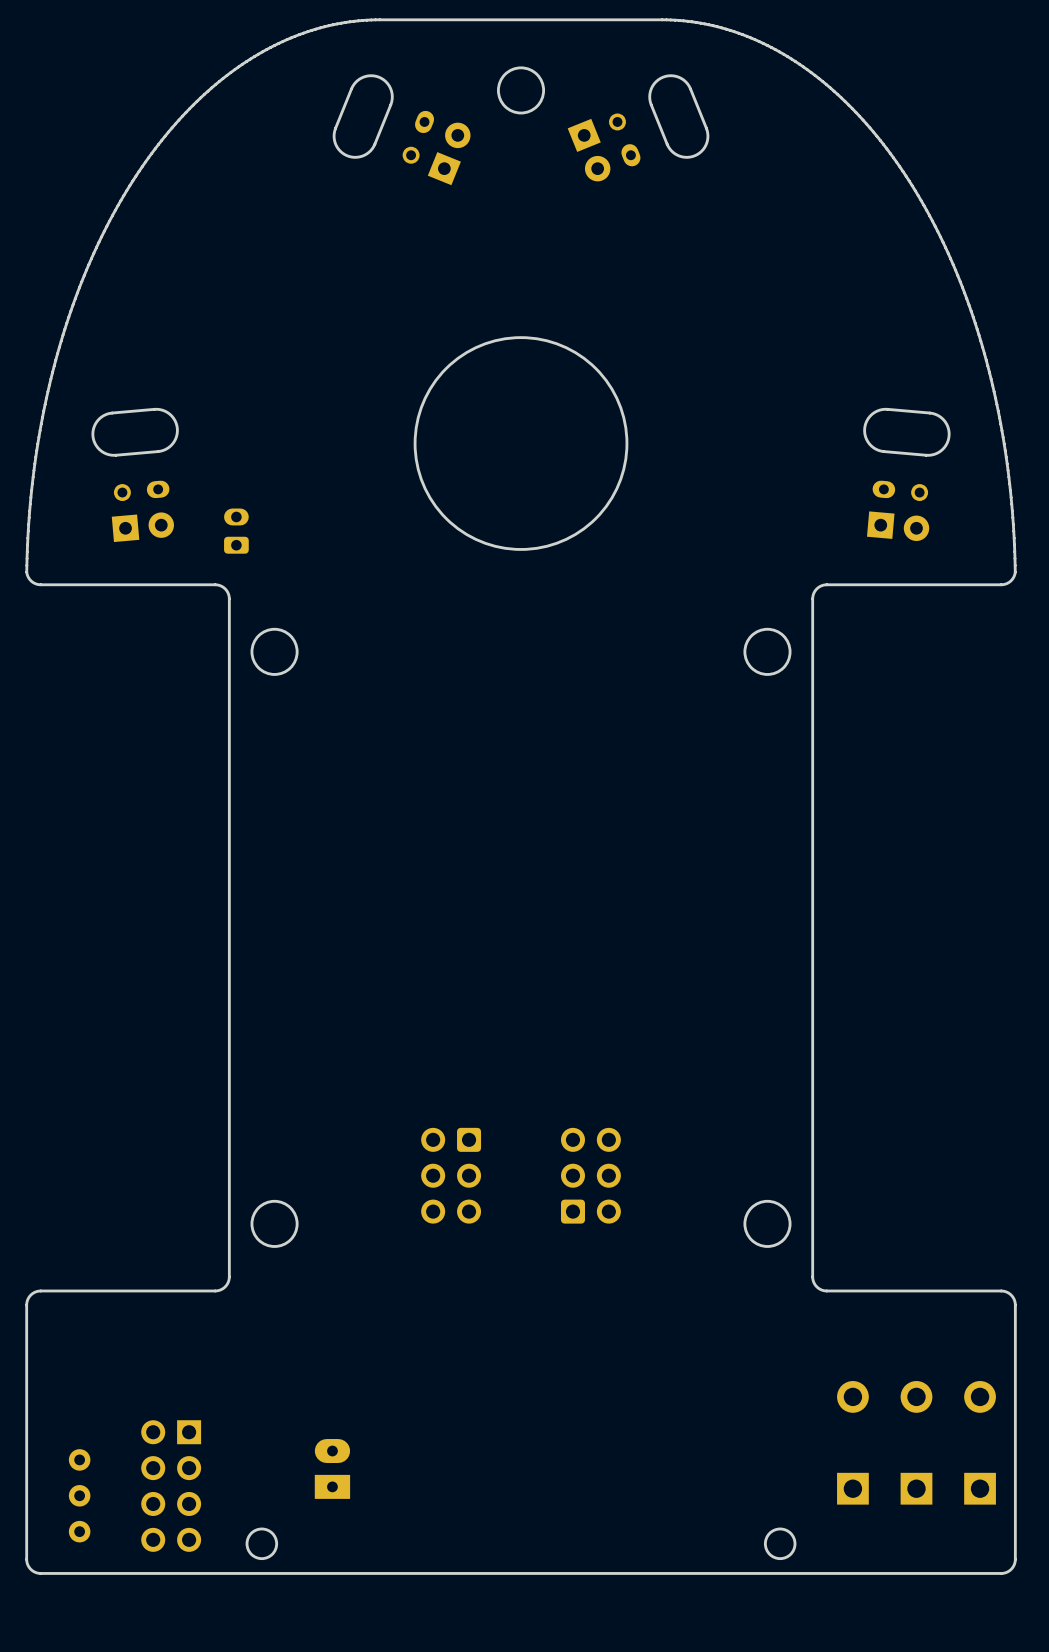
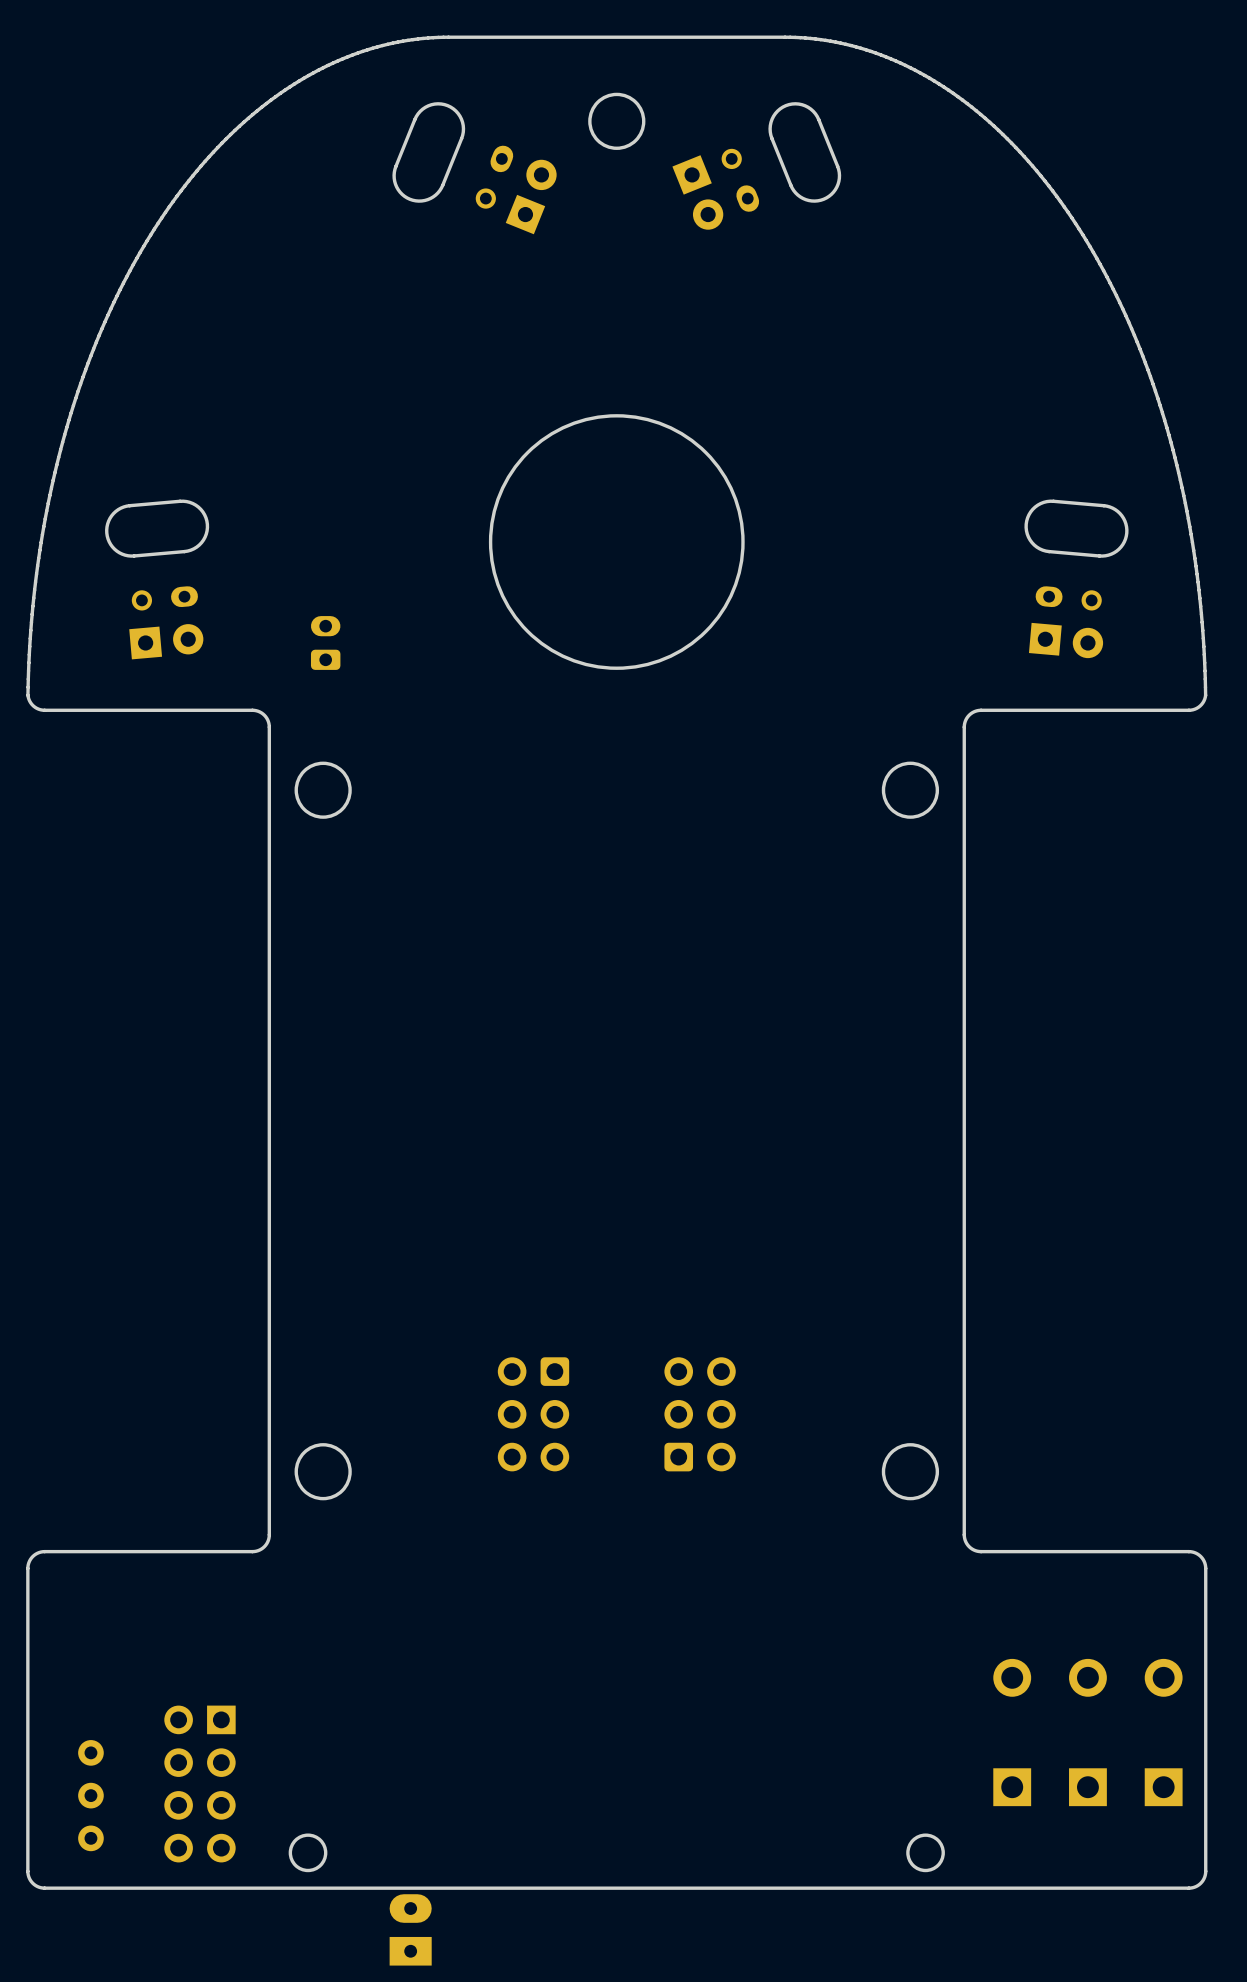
part position: (236, 531) -> (325, 642)
part position: (332, 1468) -> (410, 1929)

